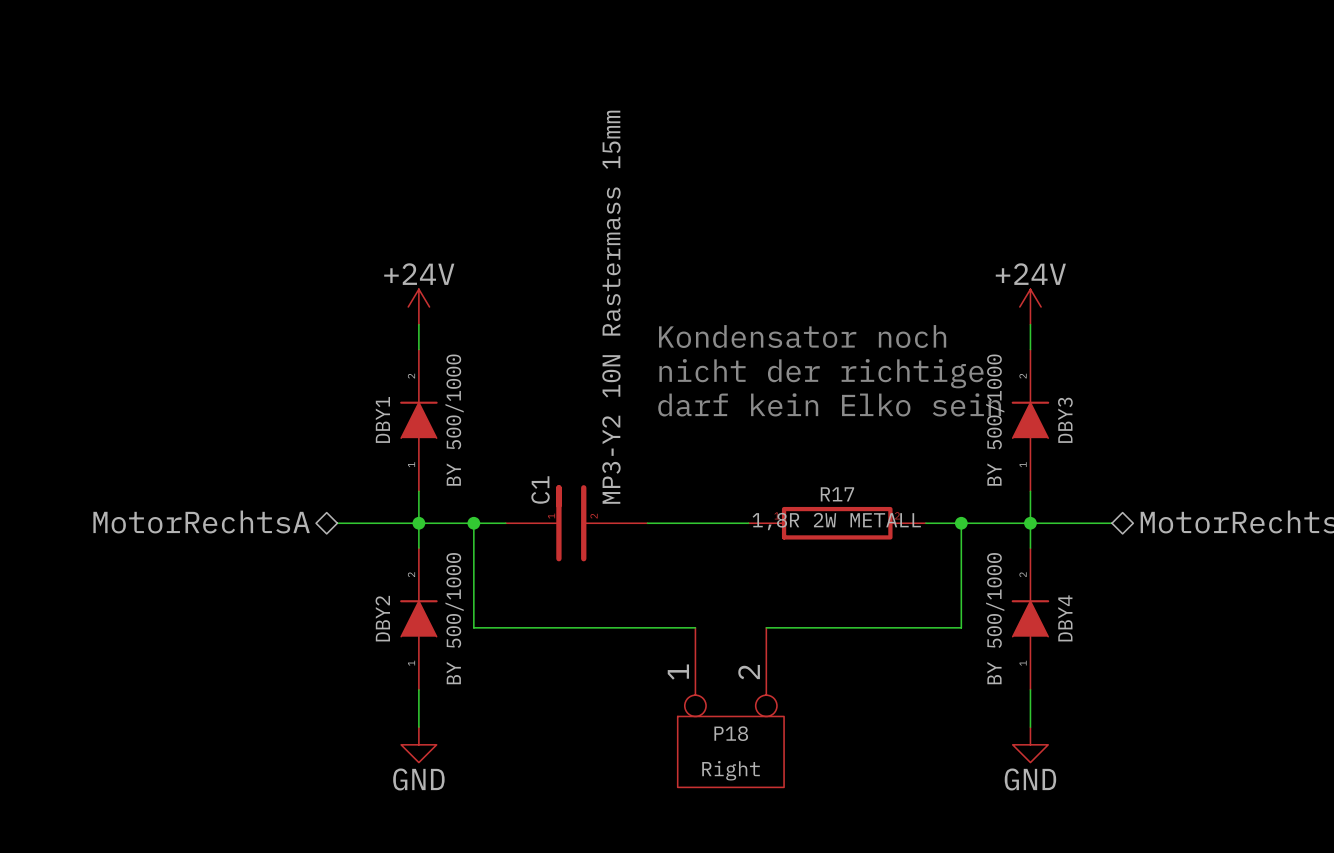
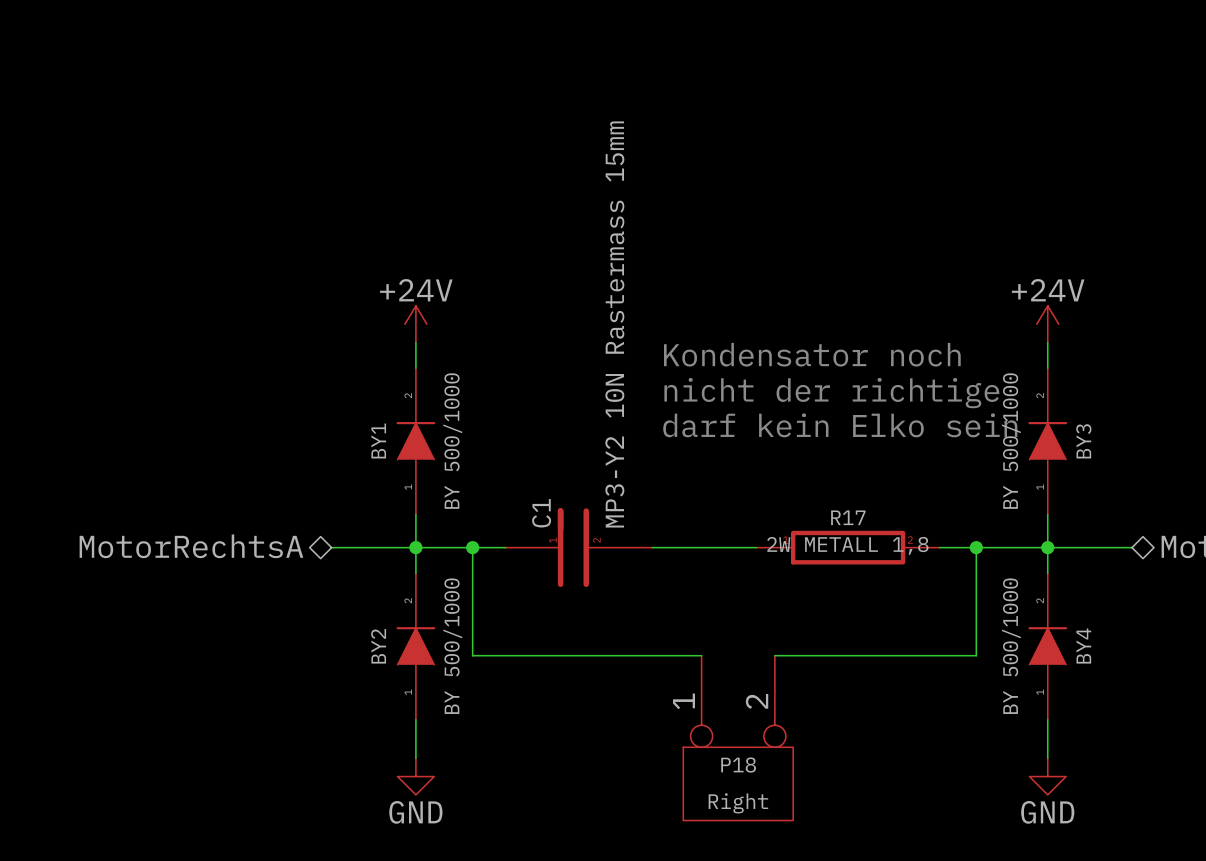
DBY1 name: DBY1 (382, 419) -> BY1 (378, 440)
DBY3 name: DBY3 (1065, 420) -> BY3 (1083, 441)
R17 value: 1,8R 2W METALL (836, 521) -> 2W METALL 1,8 (847, 545)
DBY2 name: DBY2 (382, 618) -> BY2 (378, 646)
DBY4 name: DBY4 (1065, 618) -> BY4 (1083, 646)

